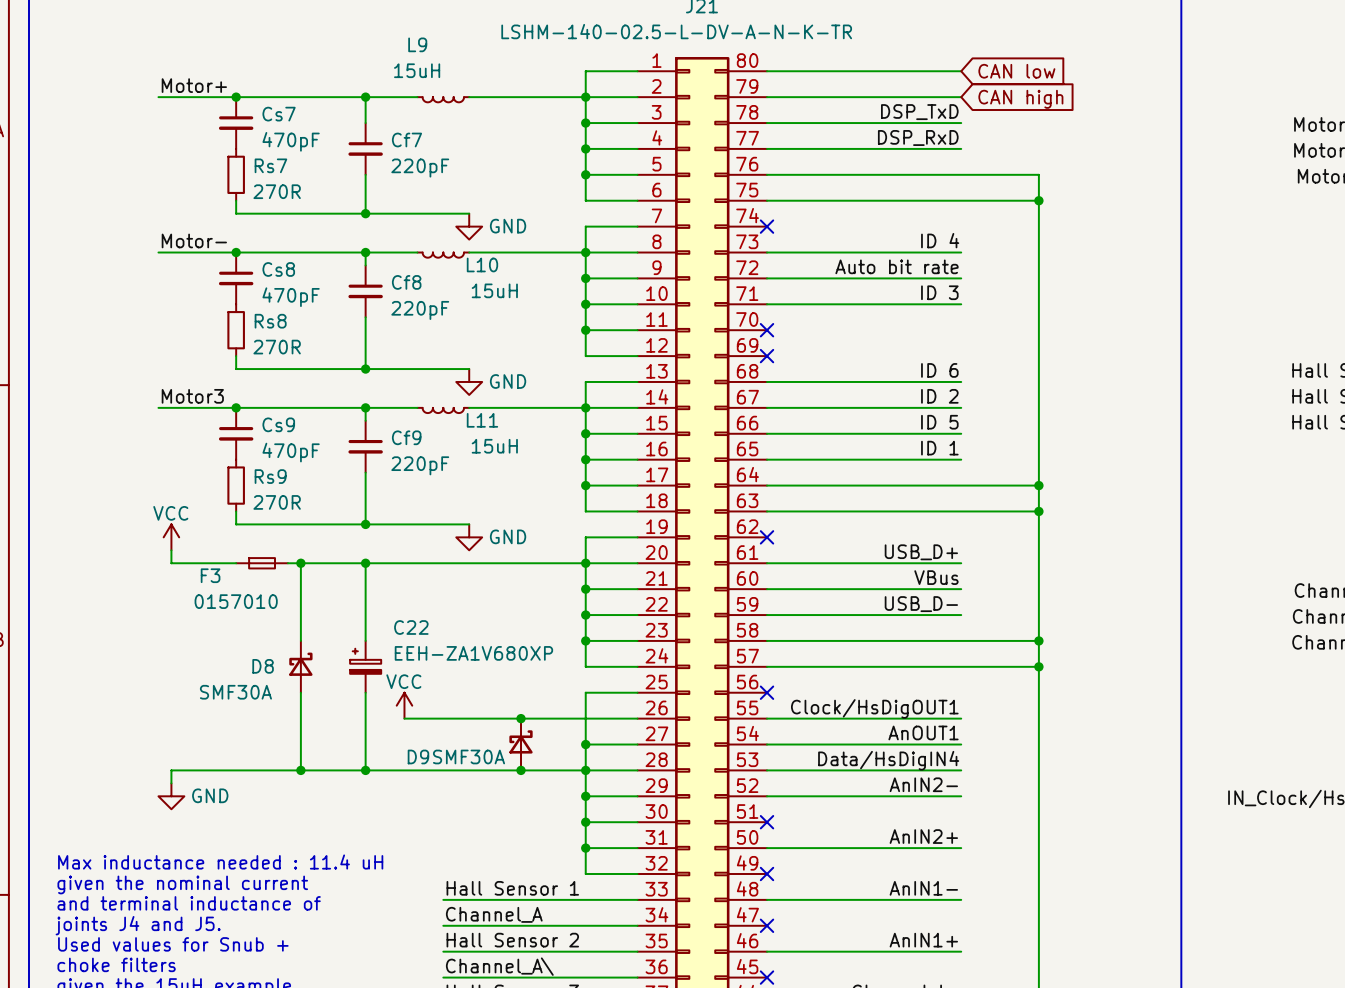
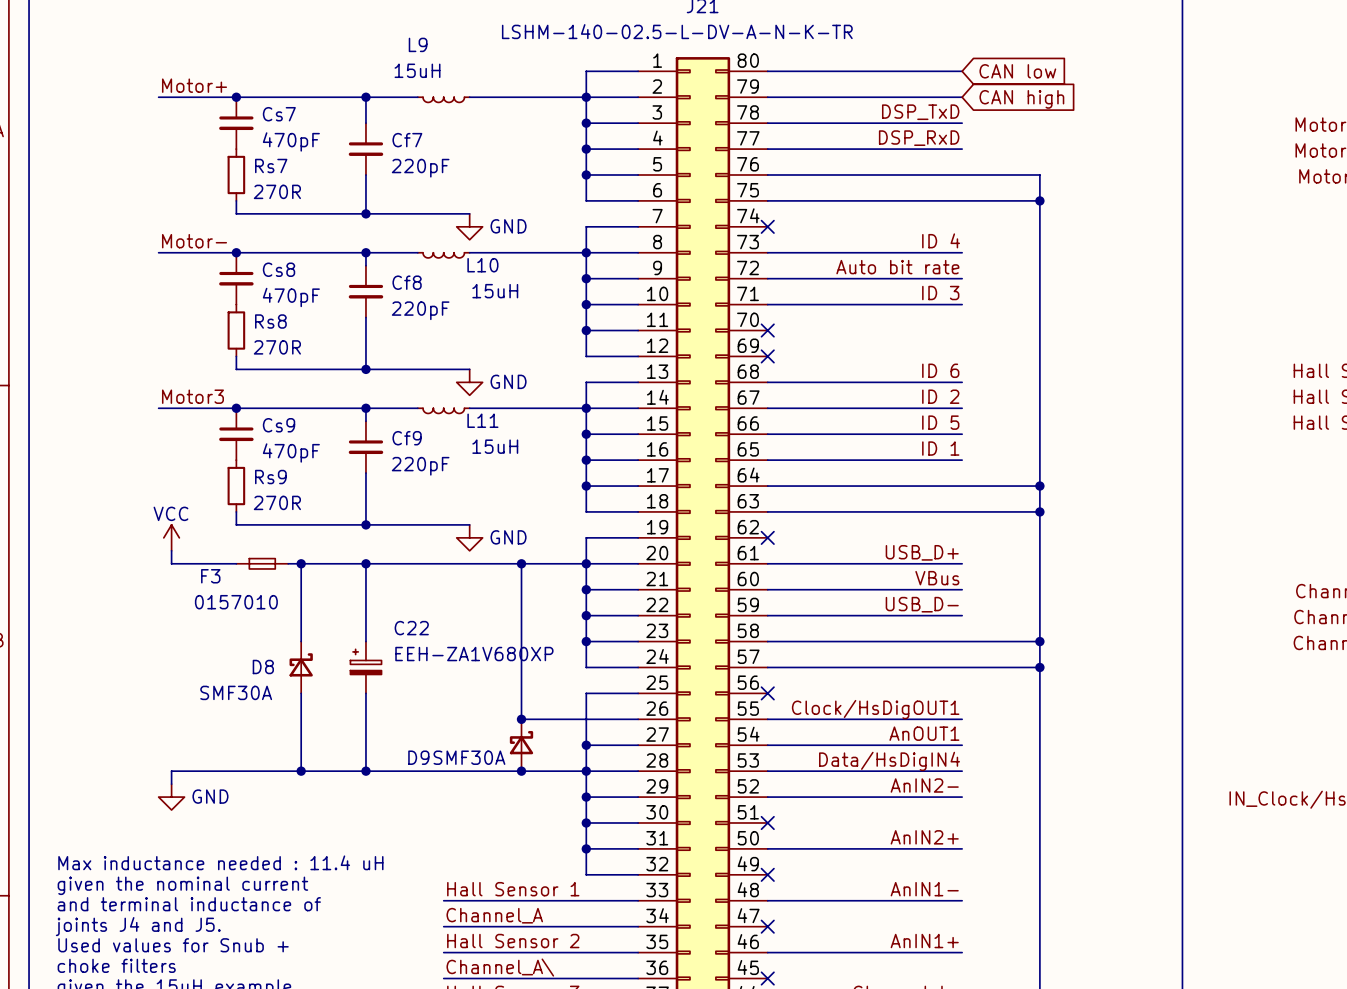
junction: none -> (521, 563)
power symbol: VCC (404, 705) -> none
wire: (404, 718) (521, 718) -> (521, 563) (521, 719)

